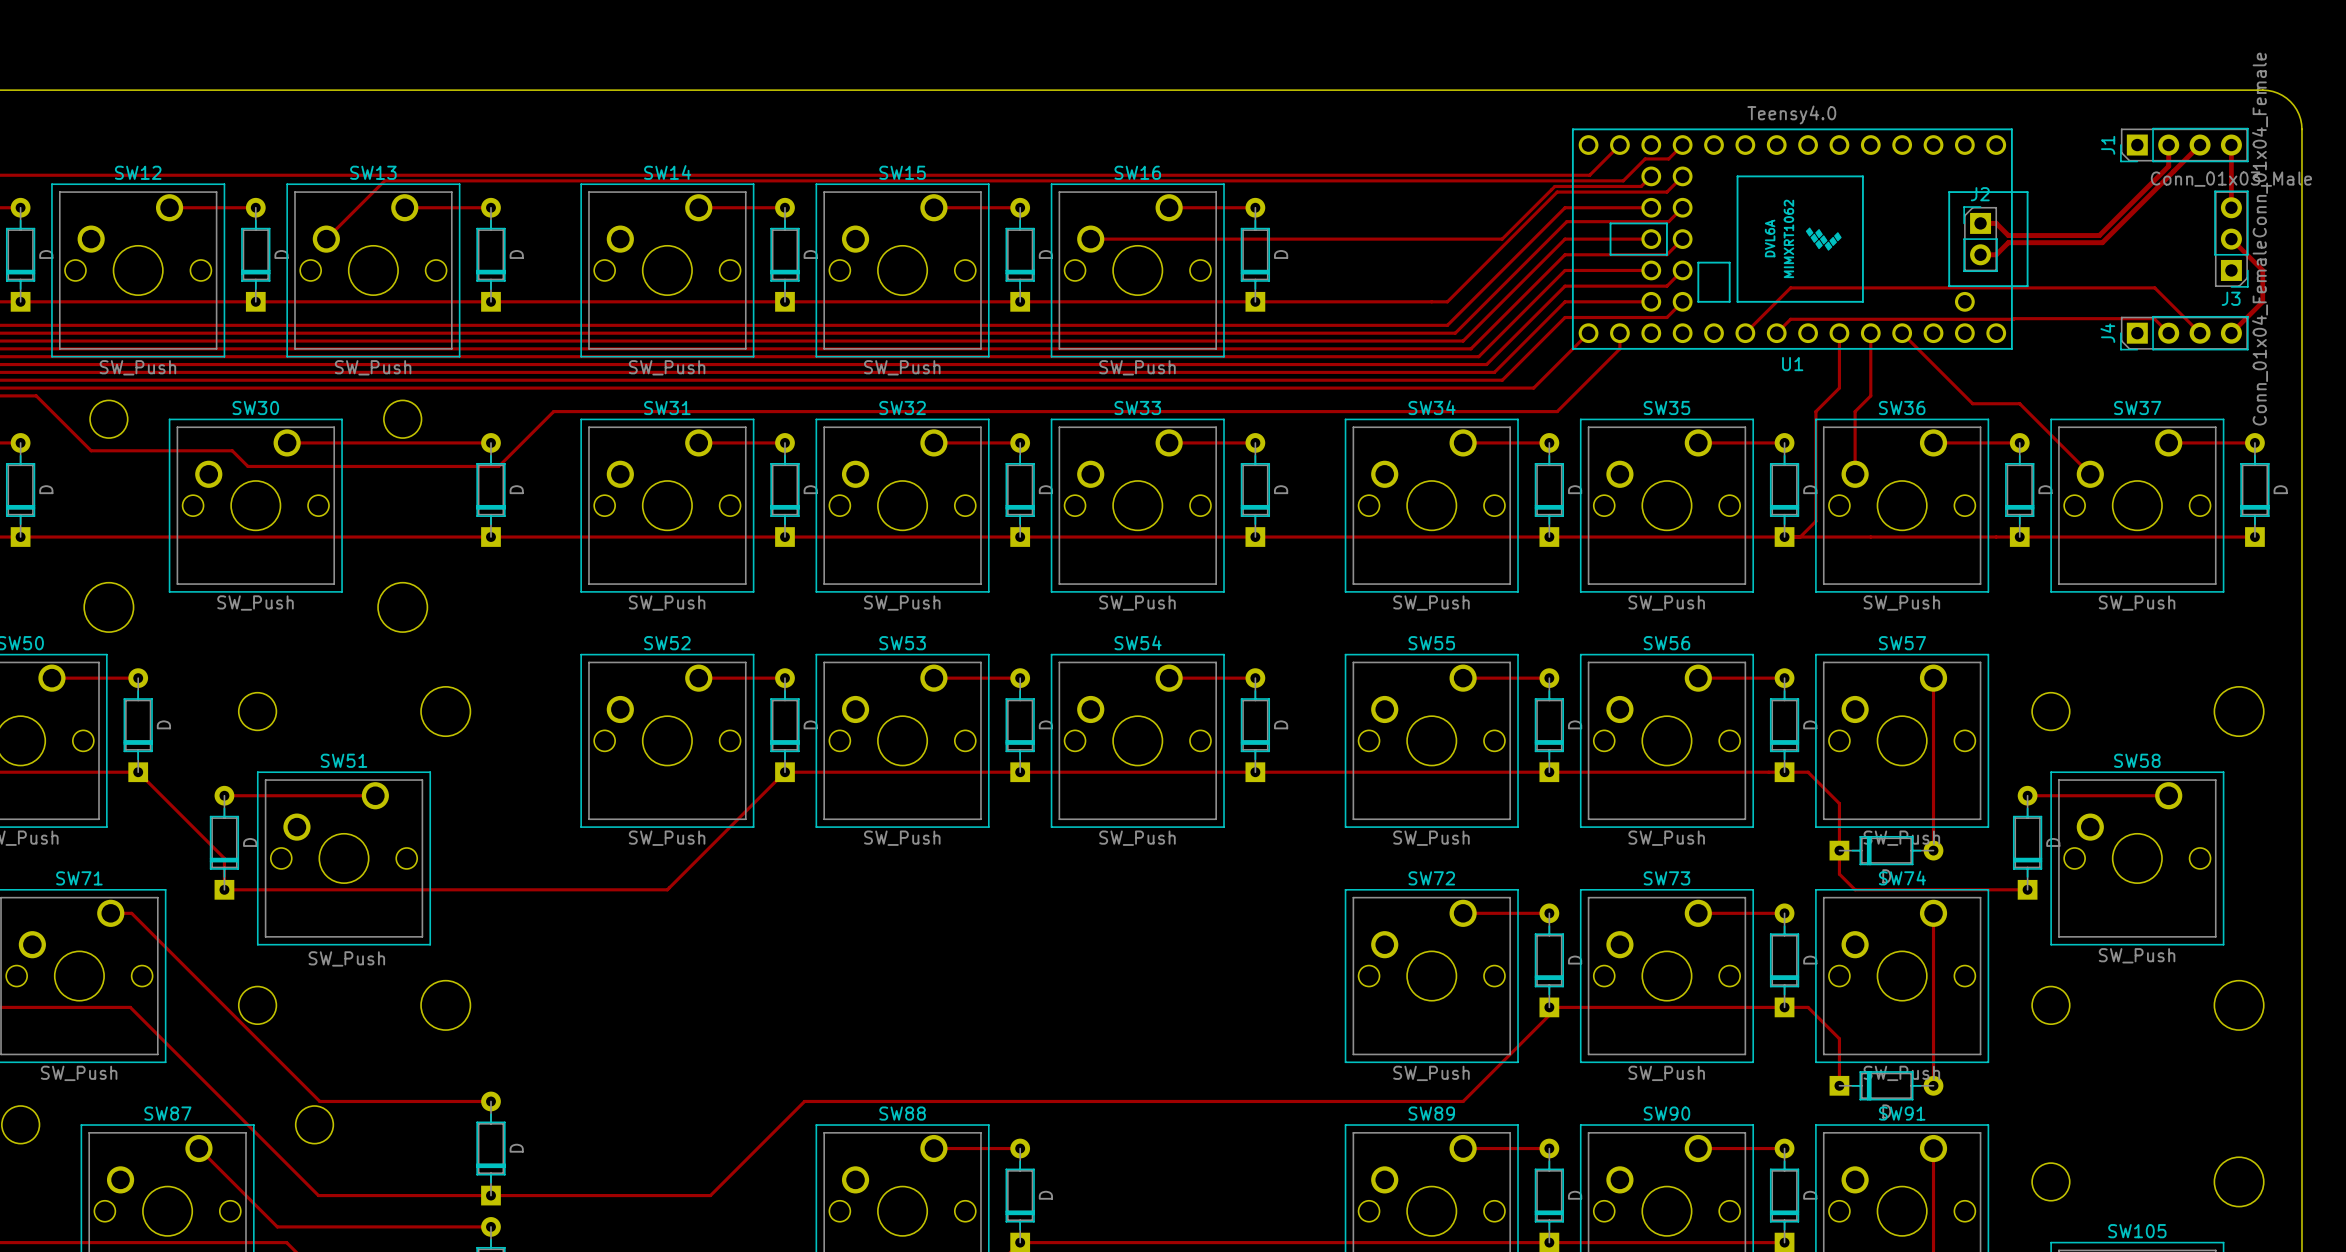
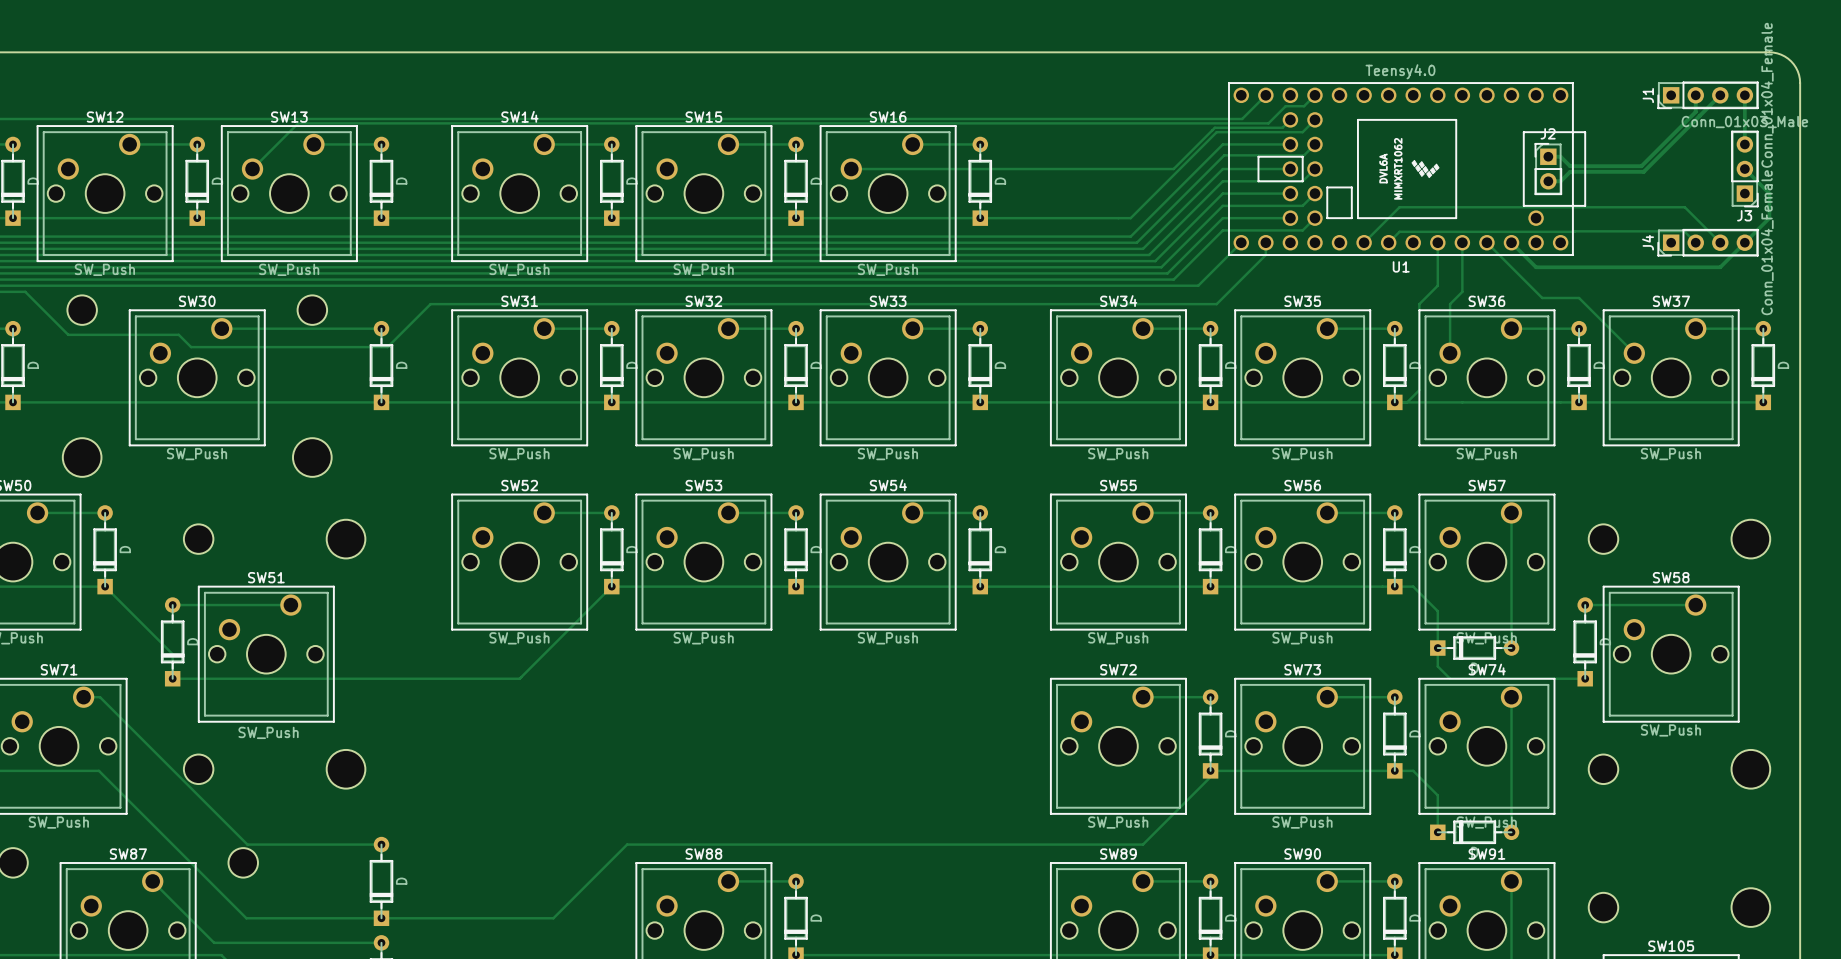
track: none -> (1511, 242) (1536, 267) (1720, 267) (1744, 242)

